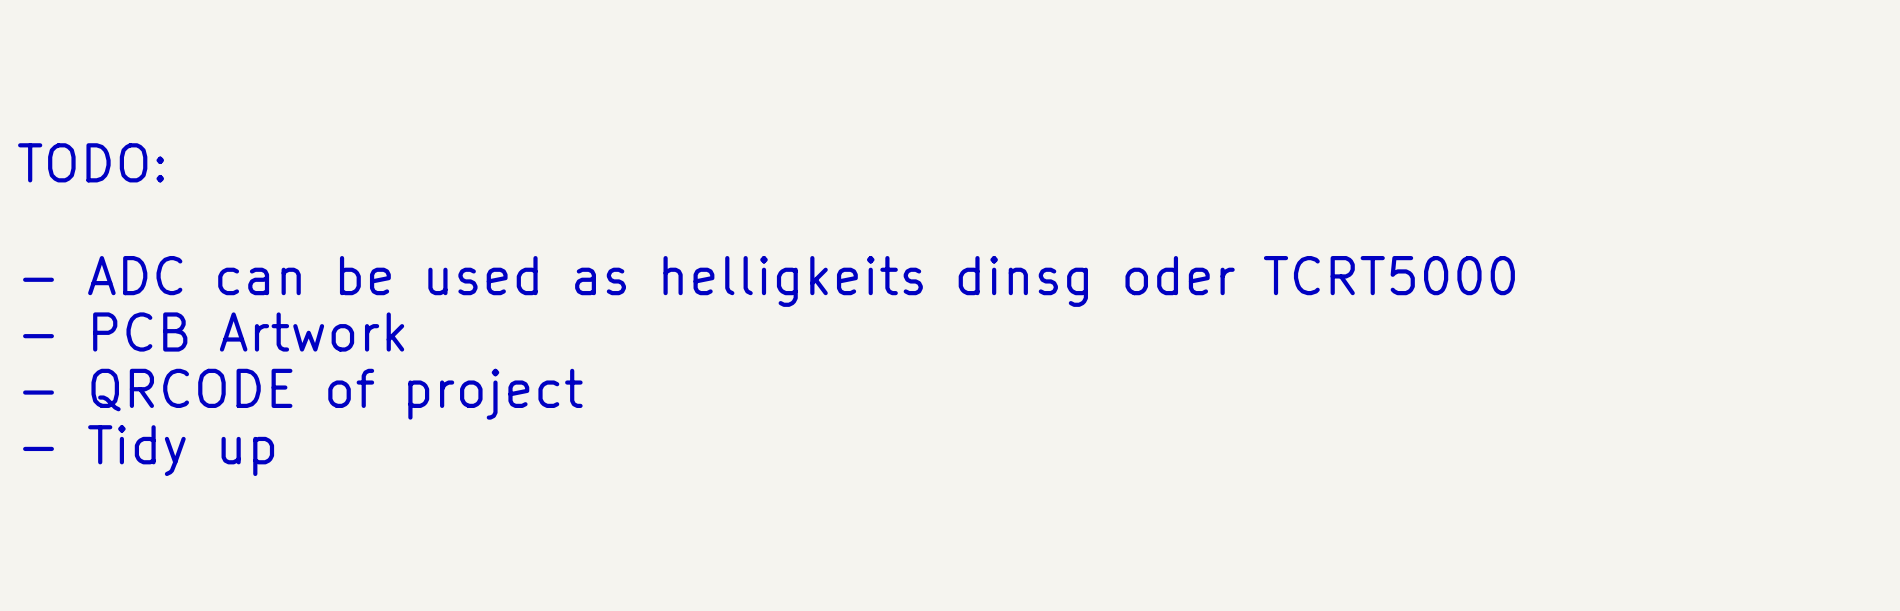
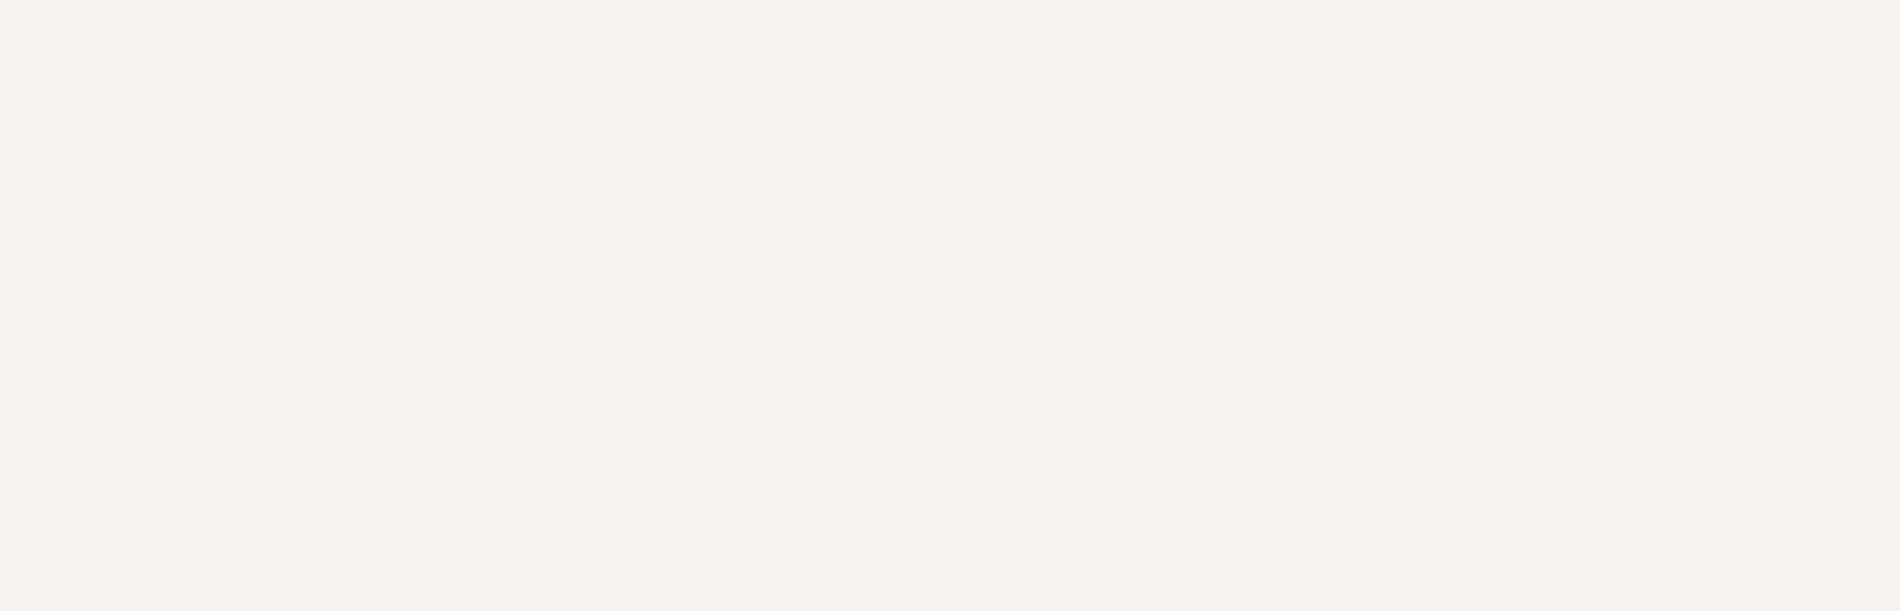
text: TODO: (91, 162) -> none
text: - ADC can be used as helligkeits dinsg oder TCRT5000 (768, 281) -> none
text: - PCB Artwork (213, 331) -> none
text: - QRCODE of project (302, 394) -> none
text: - Tidy up (148, 450) -> none

